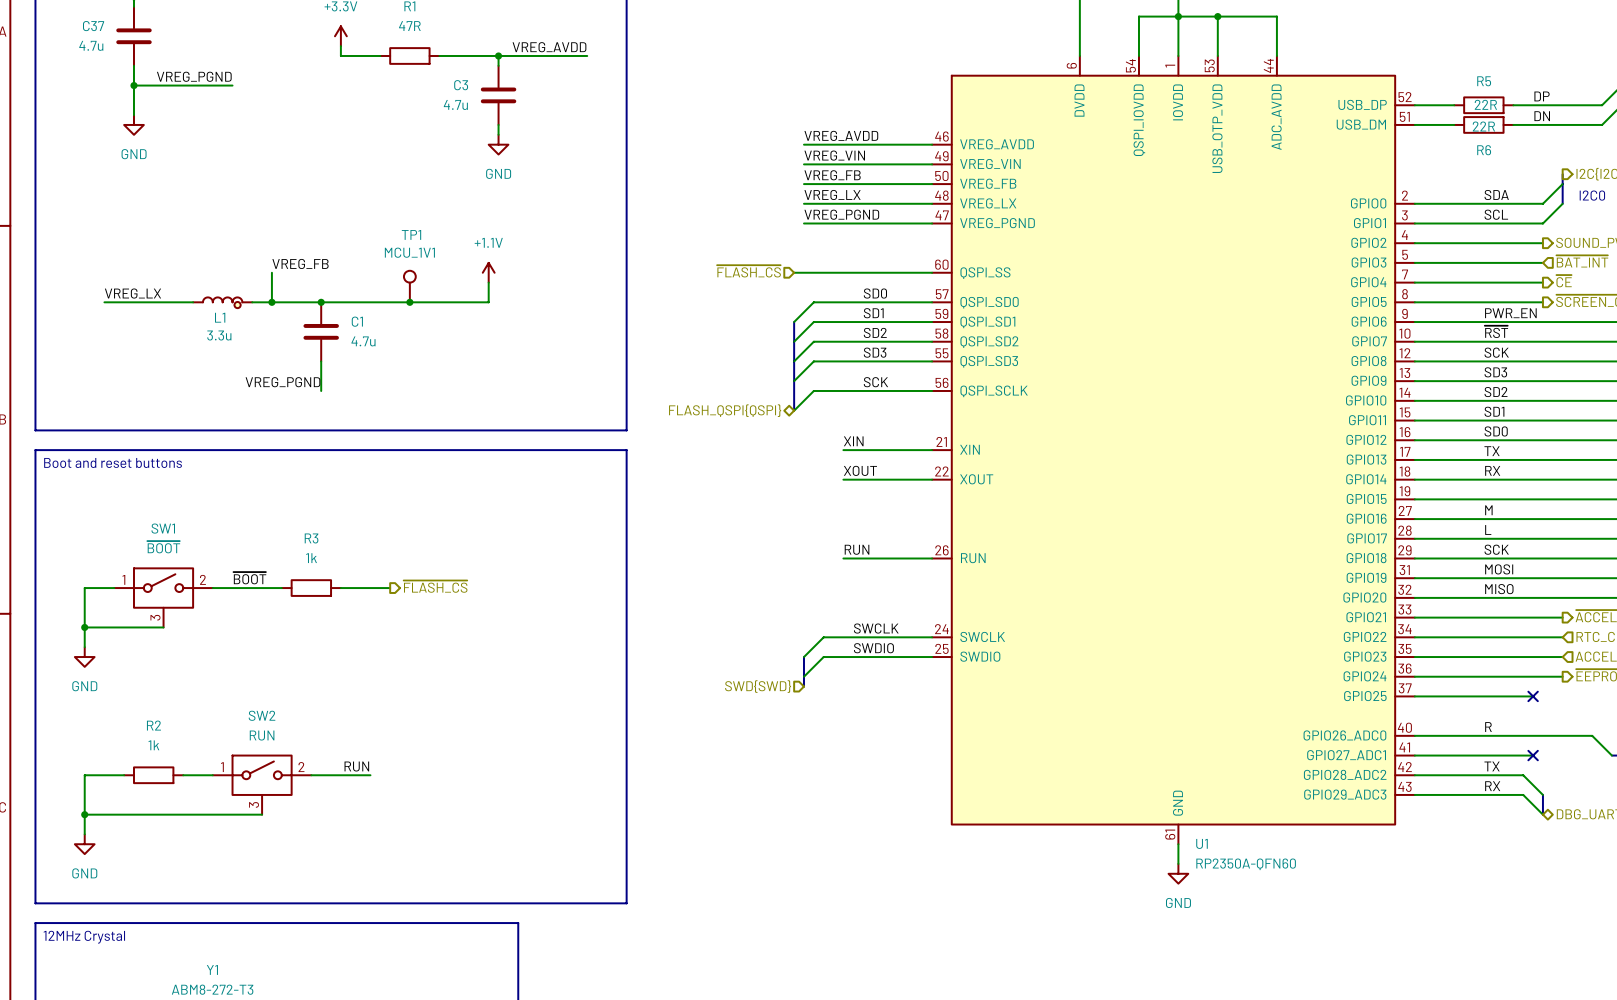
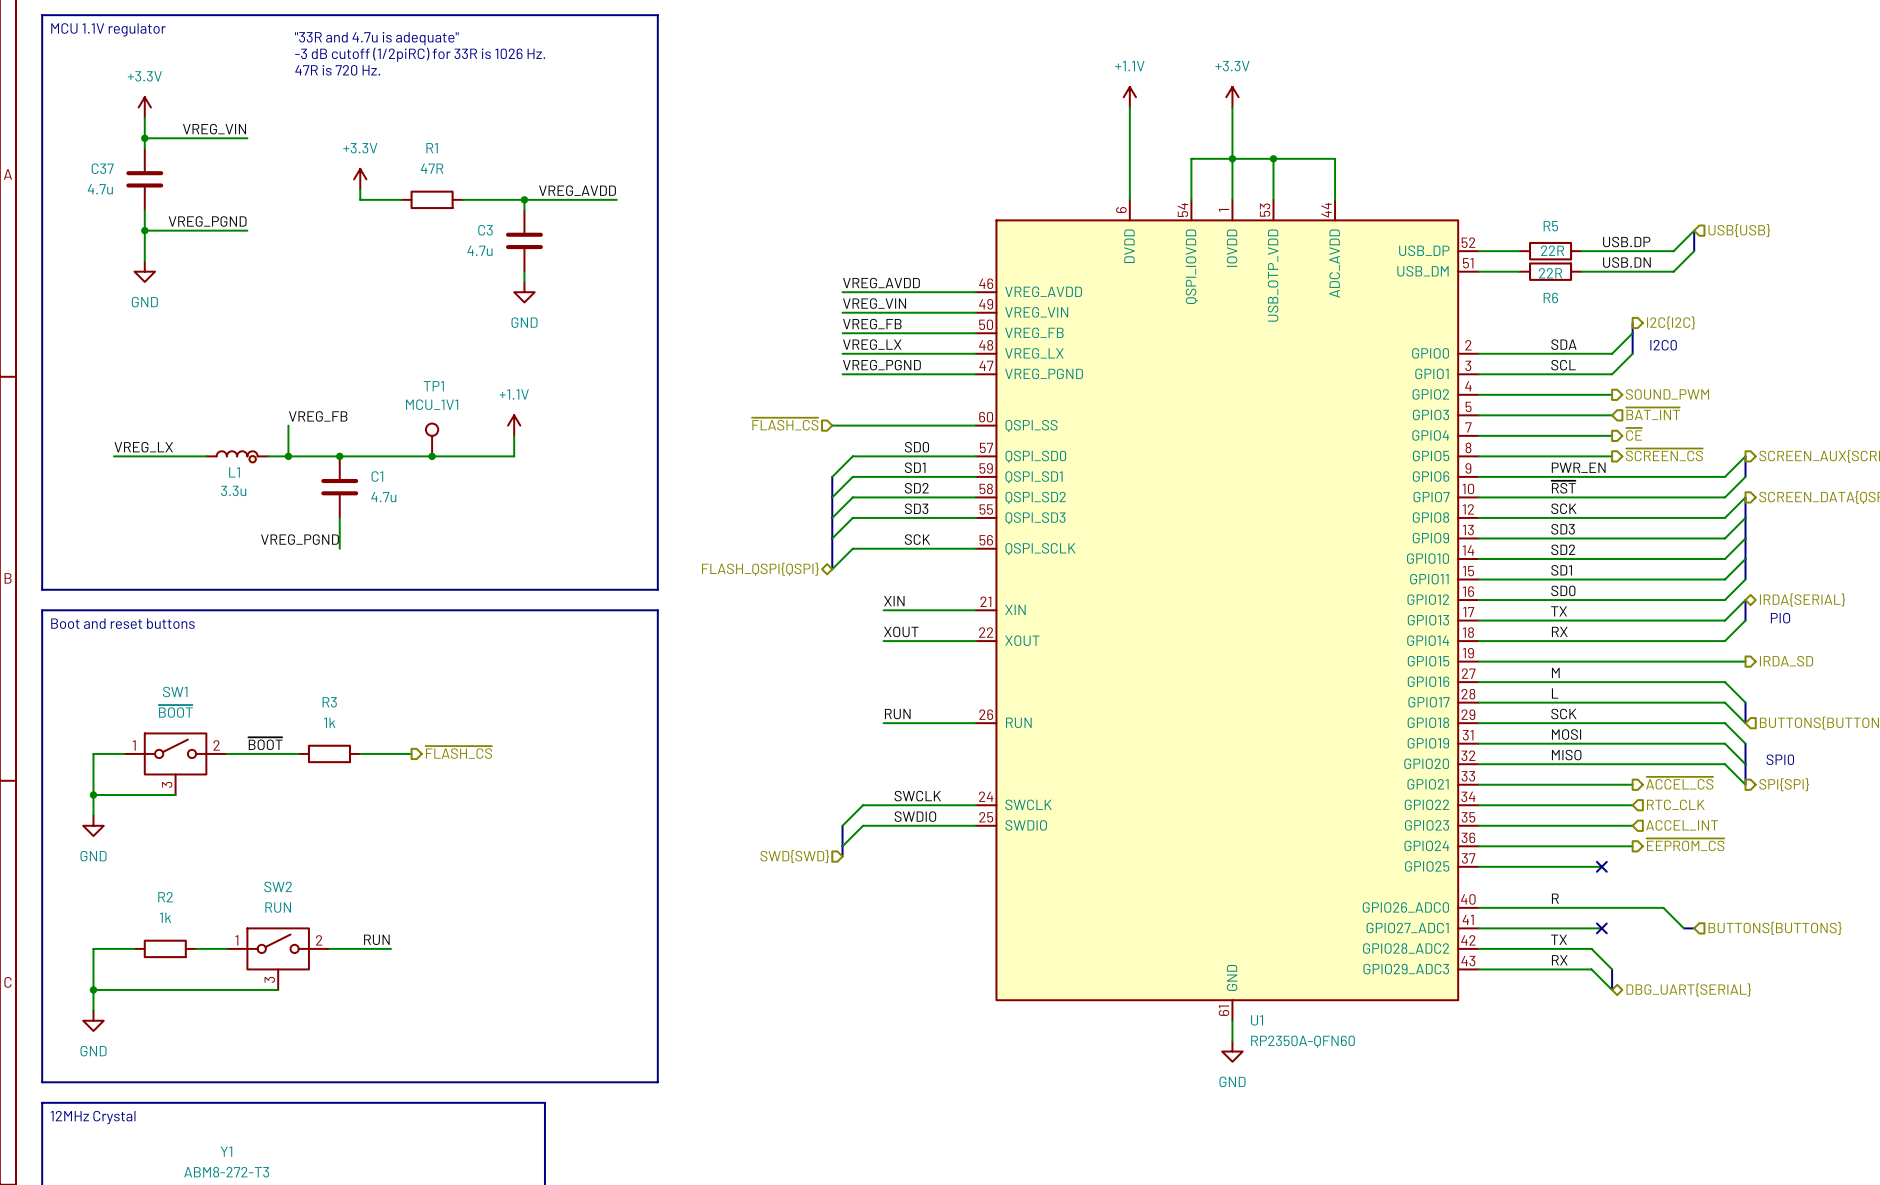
label: DP (1542, 96) -> USB.DP (1626, 242)
label: DN (1542, 116) -> USB.DN (1626, 262)

